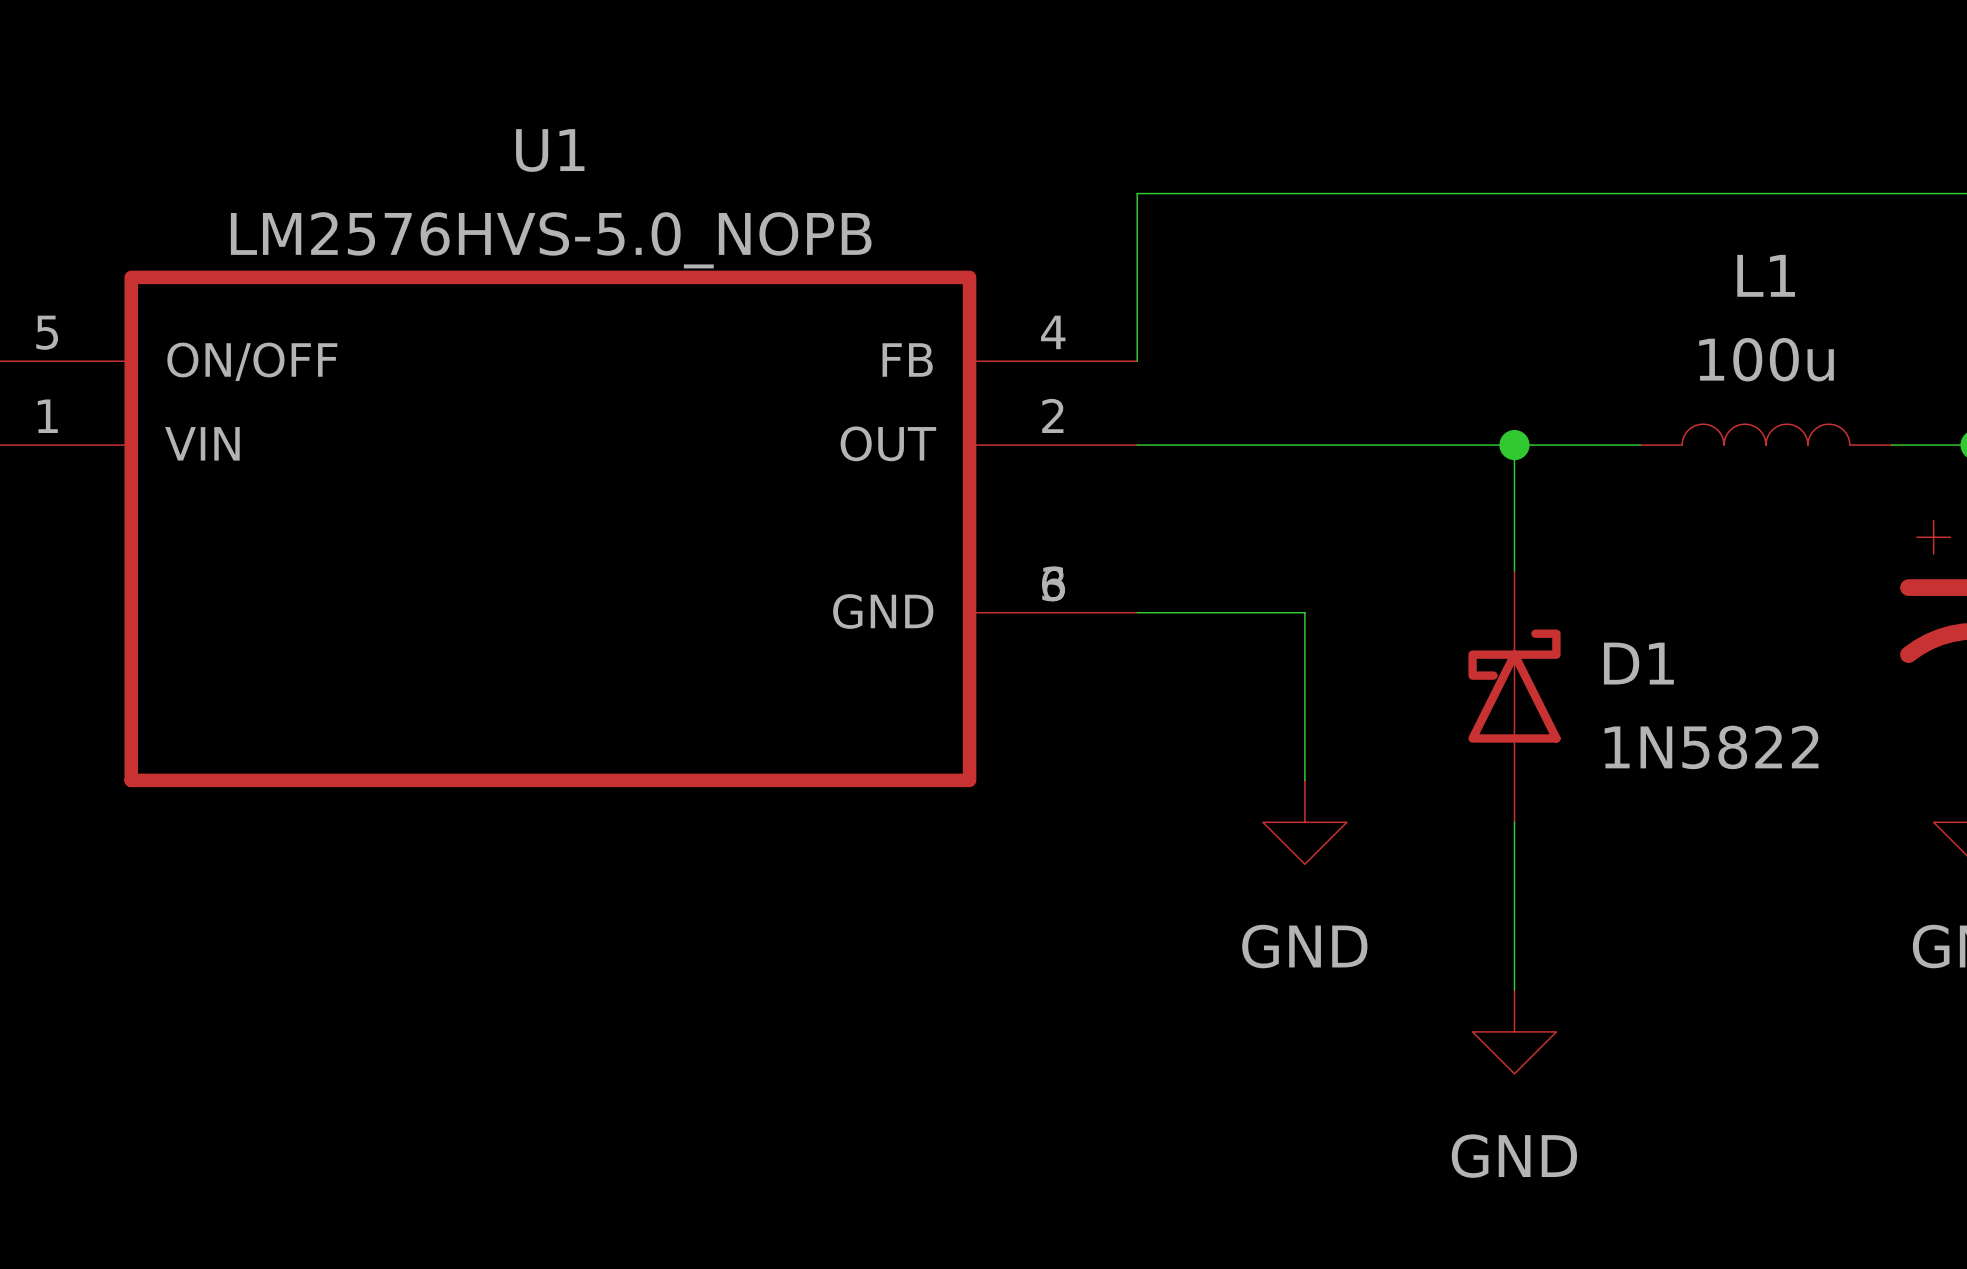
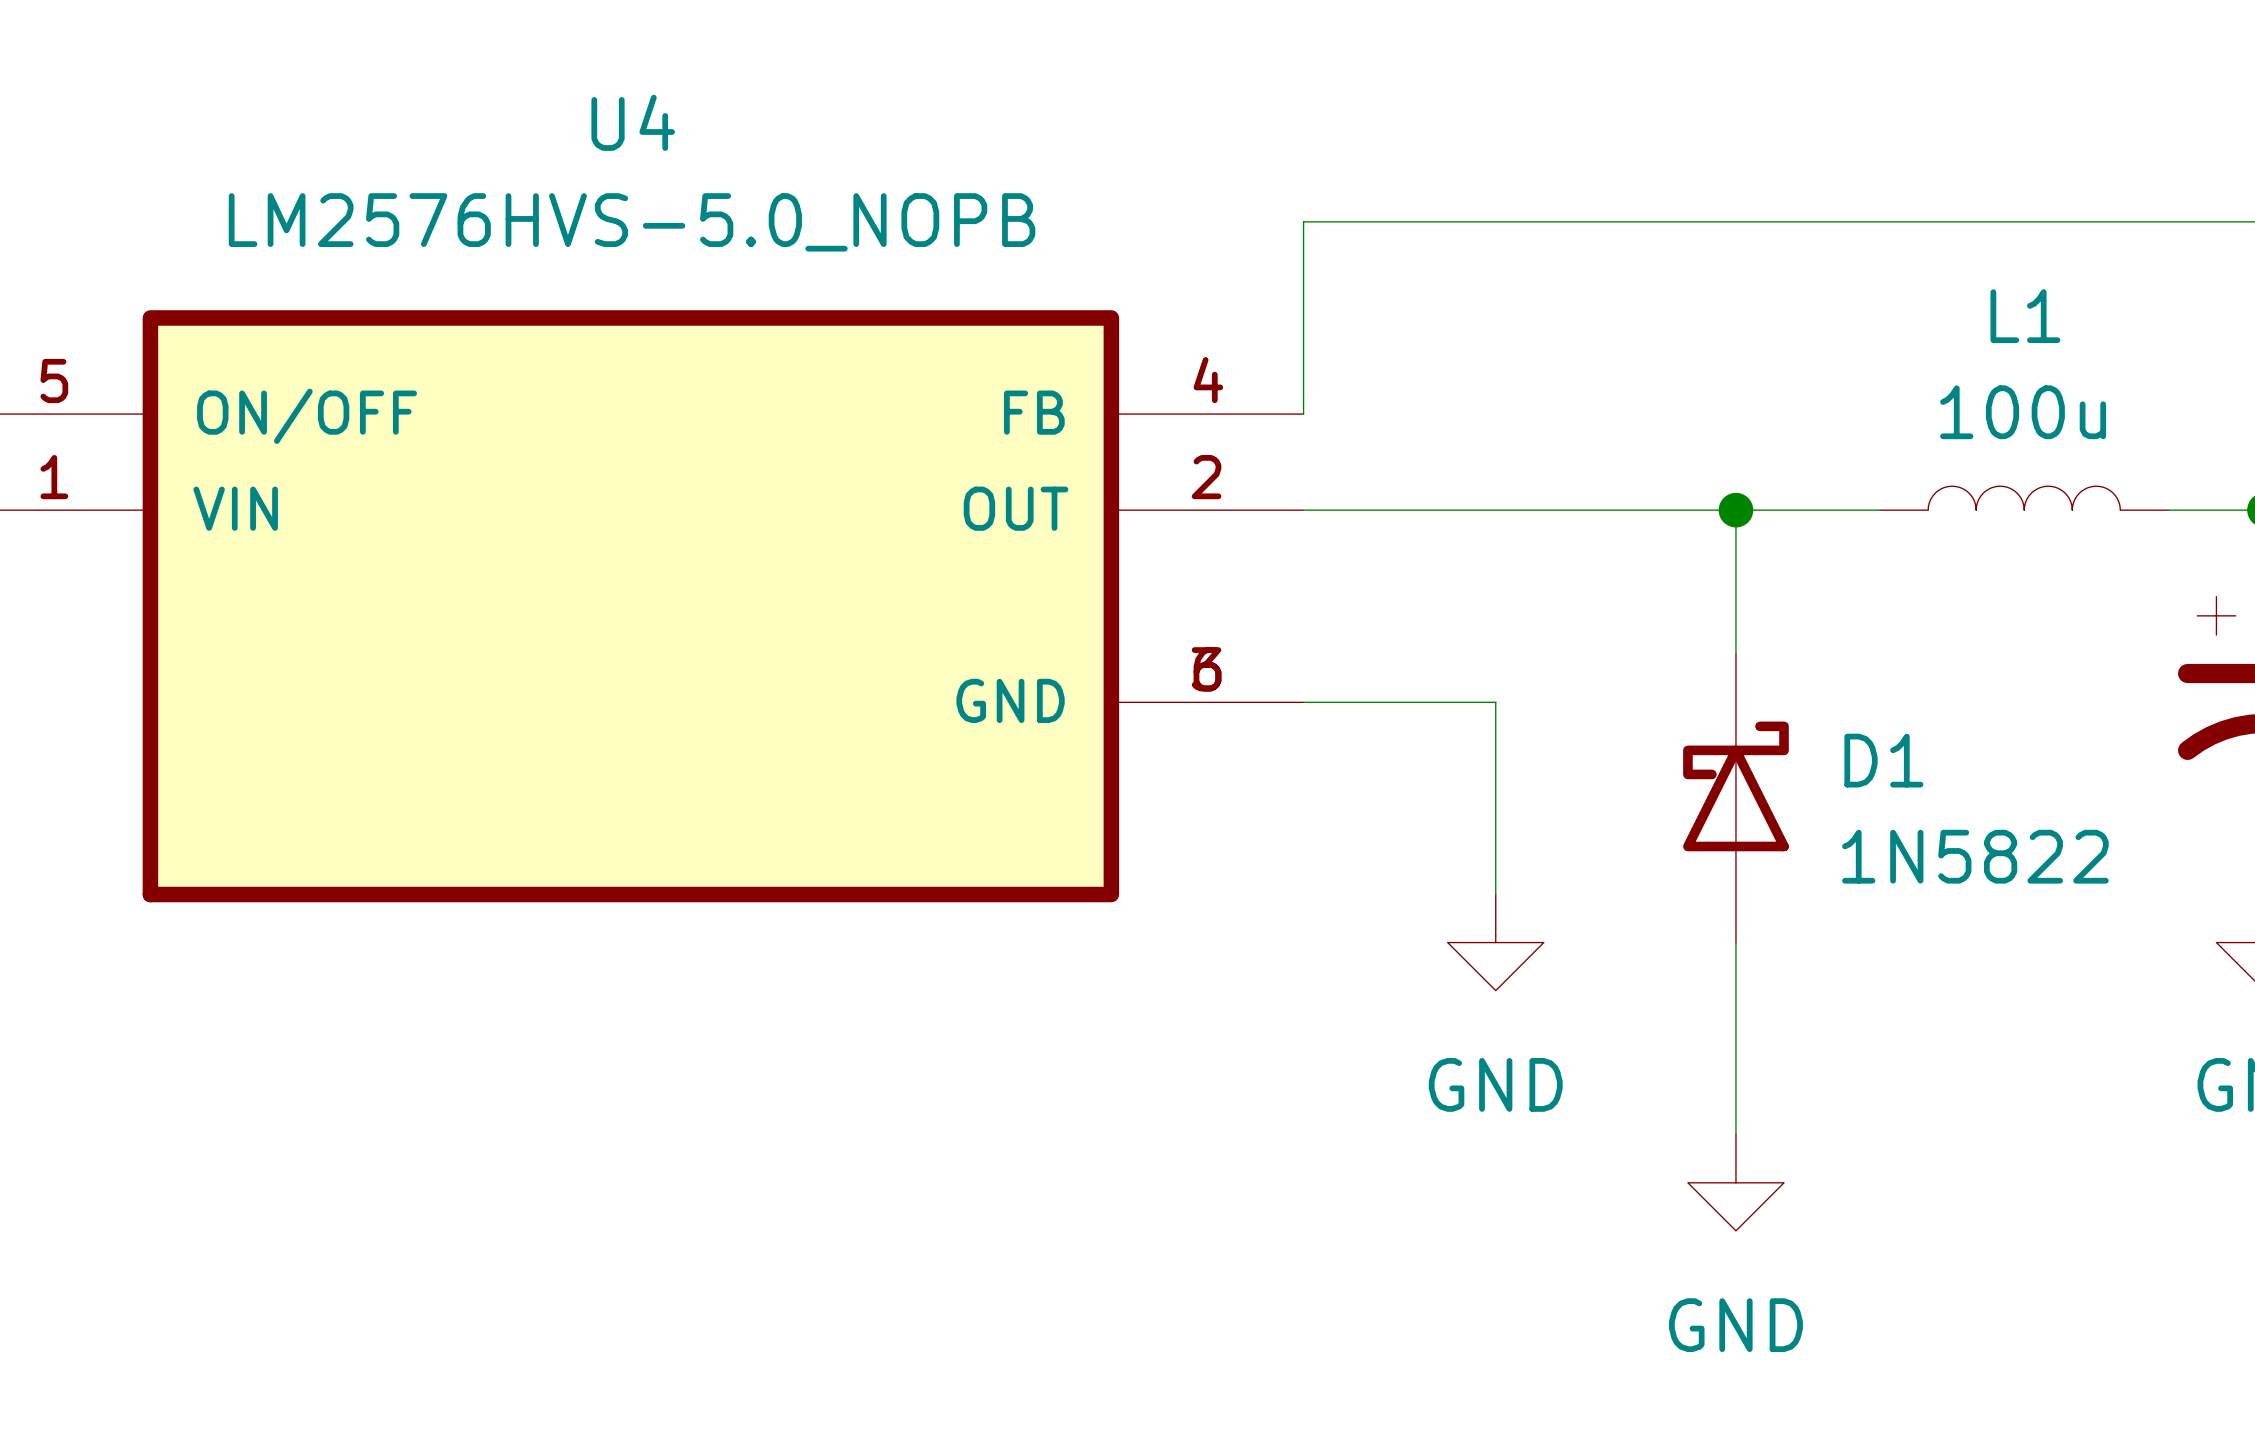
U1 name: U1 (550, 150) -> U4 (633, 122)
U1 value position: LM2576HVS-5.0_NOPB (551, 240) -> LM2576HVS-5.0_NOPB (632, 222)

